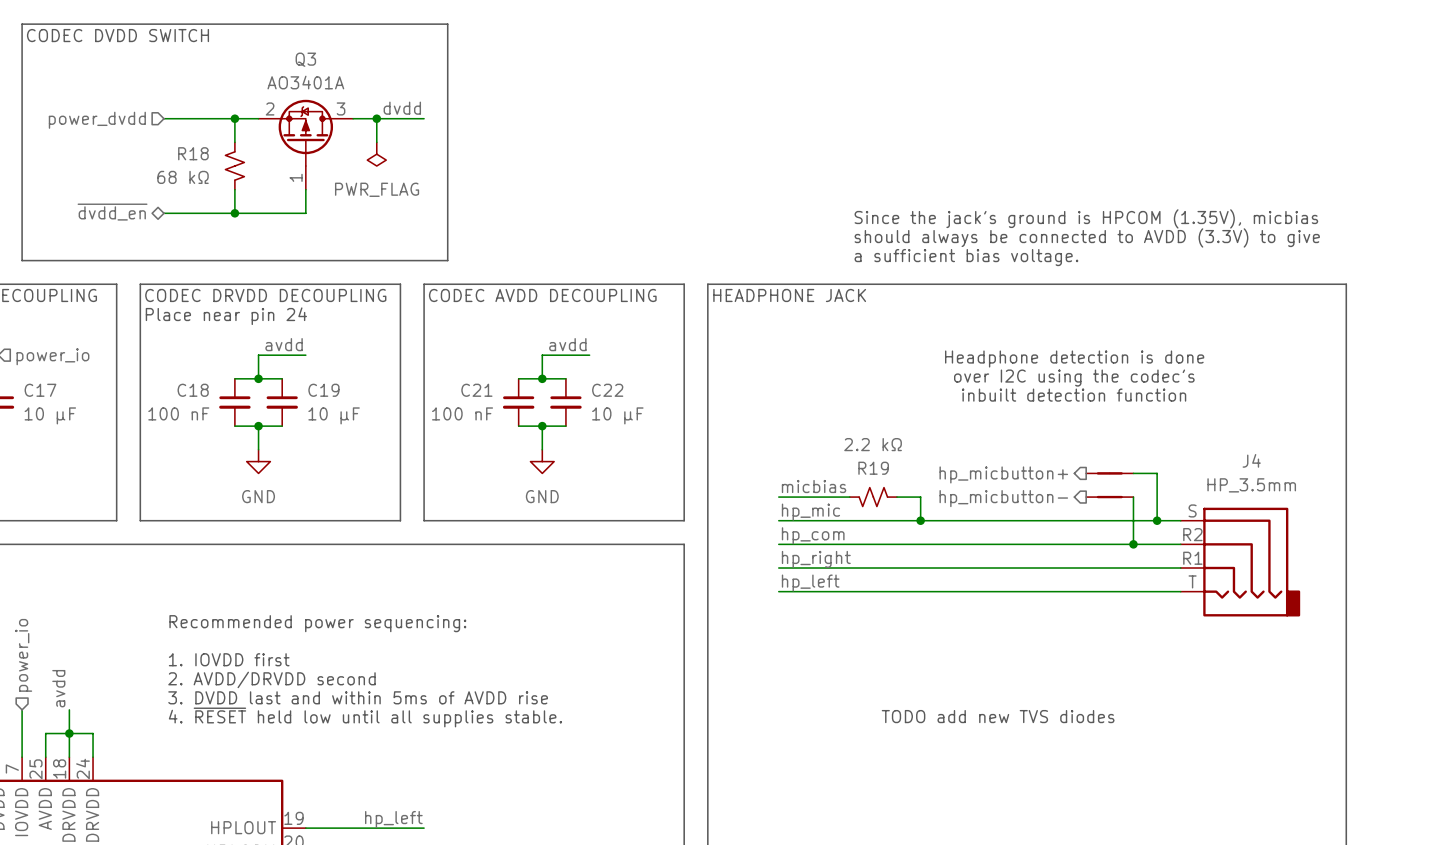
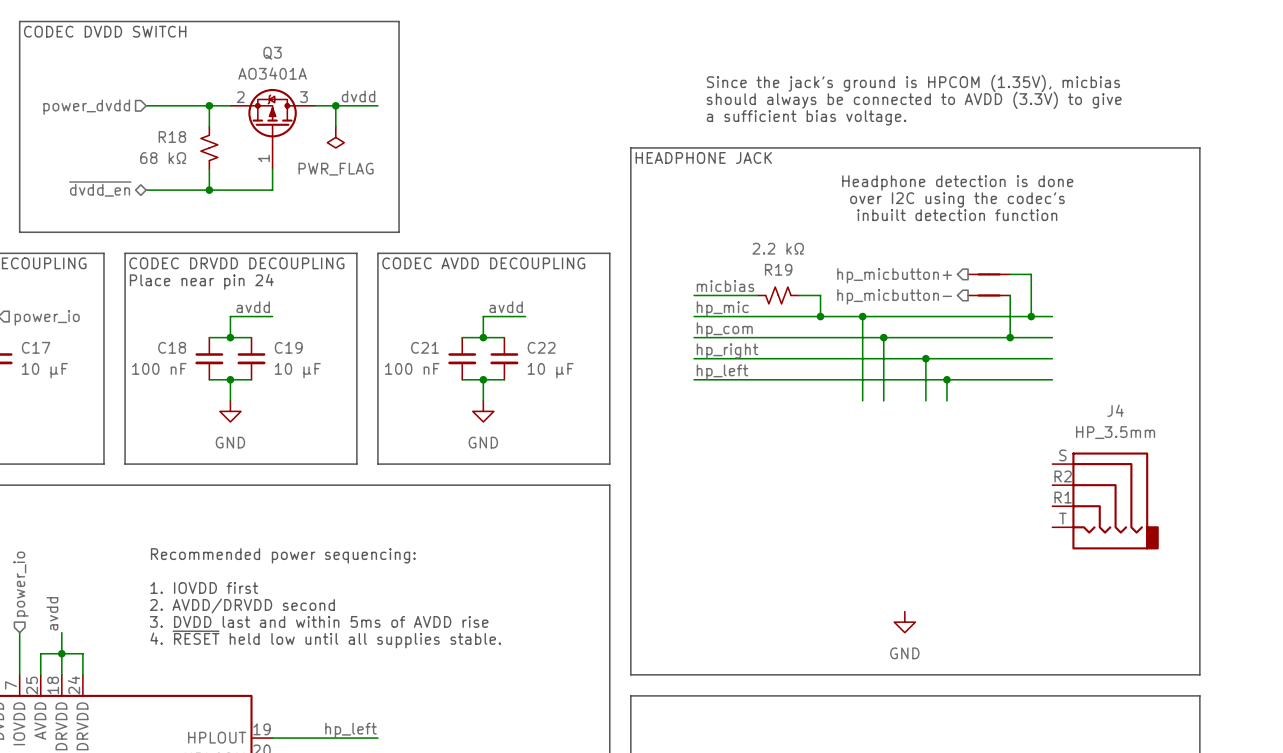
text position: Since the jack's ground is HPCOM (1.35V), micbias (1086, 218) -> Since the jack's ground is HPCOM (1.35V), micbias (913, 83)
text position: should always be connected to AVDD (3.3V) to give (1087, 237) -> should always be connected to AVDD (3.3V) to give (914, 100)
text position: a sufficient bias voltage. (966, 257) -> a sufficient bias voltage. (806, 117)
line: (707, 284) (1346, 284) -> (630, 253) (630, 147) (1199, 147) (1199, 253)
text position: HEADPHONE JACK (789, 295) -> HEADPHONE JACK (703, 157)
part: none -> (989, 274)
part: none -> (989, 295)
junction: none -> (820, 316)
wire: none -> (862, 316) (862, 400)
junction: none -> (862, 316)
junction: none -> (1031, 316)
text position: Headphone detection is done (1074, 359) -> Headphone detection is done (957, 182)
wire: none -> (883, 337) (883, 400)
junction: none -> (883, 337)
text position: over I2C using the codec's (1074, 378) -> over I2C using the codec's (957, 199)
junction: none -> (1010, 337)
text position: inbuilt detection function (1074, 395) -> inbuilt detection function (957, 215)
wire: none -> (925, 358) (925, 400)
junction: none -> (925, 358)
wire: none -> (946, 379) (946, 400)
junction: none -> (946, 379)
part: (1109, 473) -> none
wire: (1133, 473) (1157, 473) (1157, 520) -> (1010, 274) (1031, 274) (1031, 316)
hierarchical label position: hp_micbutton+ (1003, 474) -> hp_micbutton+ (894, 275)
label position: micbias (814, 486) -> micbias (725, 286)
wire: (778, 497) (849, 497) -> (694, 295) (757, 295)
R19 position: (873, 497) -> (778, 295)
wire: (897, 497) (920, 497) (920, 520) -> (799, 295) (820, 295) (820, 316)
part: (1109, 497) -> none
wire: (1133, 497) (1133, 544) -> (1010, 295) (1010, 337)
hierarchical label position: hp_micbutton- (1003, 498) -> hp_micbutton- (894, 296)
label position: hp_mic (810, 512) -> hp_mic (722, 308)
wire: (778, 520) (1180, 520) -> (694, 316) (1052, 316)
junction: (920, 520) -> none
junction: (1157, 520) -> none
label position: hp_com (813, 535) -> hp_com (724, 329)
wire: (778, 544) (1180, 544) -> (694, 337) (1052, 337)
junction: (1133, 544) -> none
label position: hp_right (816, 559) -> hp_right (727, 351)
wire: (778, 568) (1180, 568) -> (694, 358) (1052, 358)
label position: hp_left (810, 583) -> hp_left (722, 372)
wire: (778, 591) (1180, 591) -> (694, 379) (1052, 379)
power symbol: none -> GND (904, 622)
text: TODO add new TVS diodes (998, 716) -> none
line: (707, 757) (707, 780) -> (630, 674) (1199, 674)
line: (1346, 757) (1346, 780) -> (630, 695) (1199, 695)

